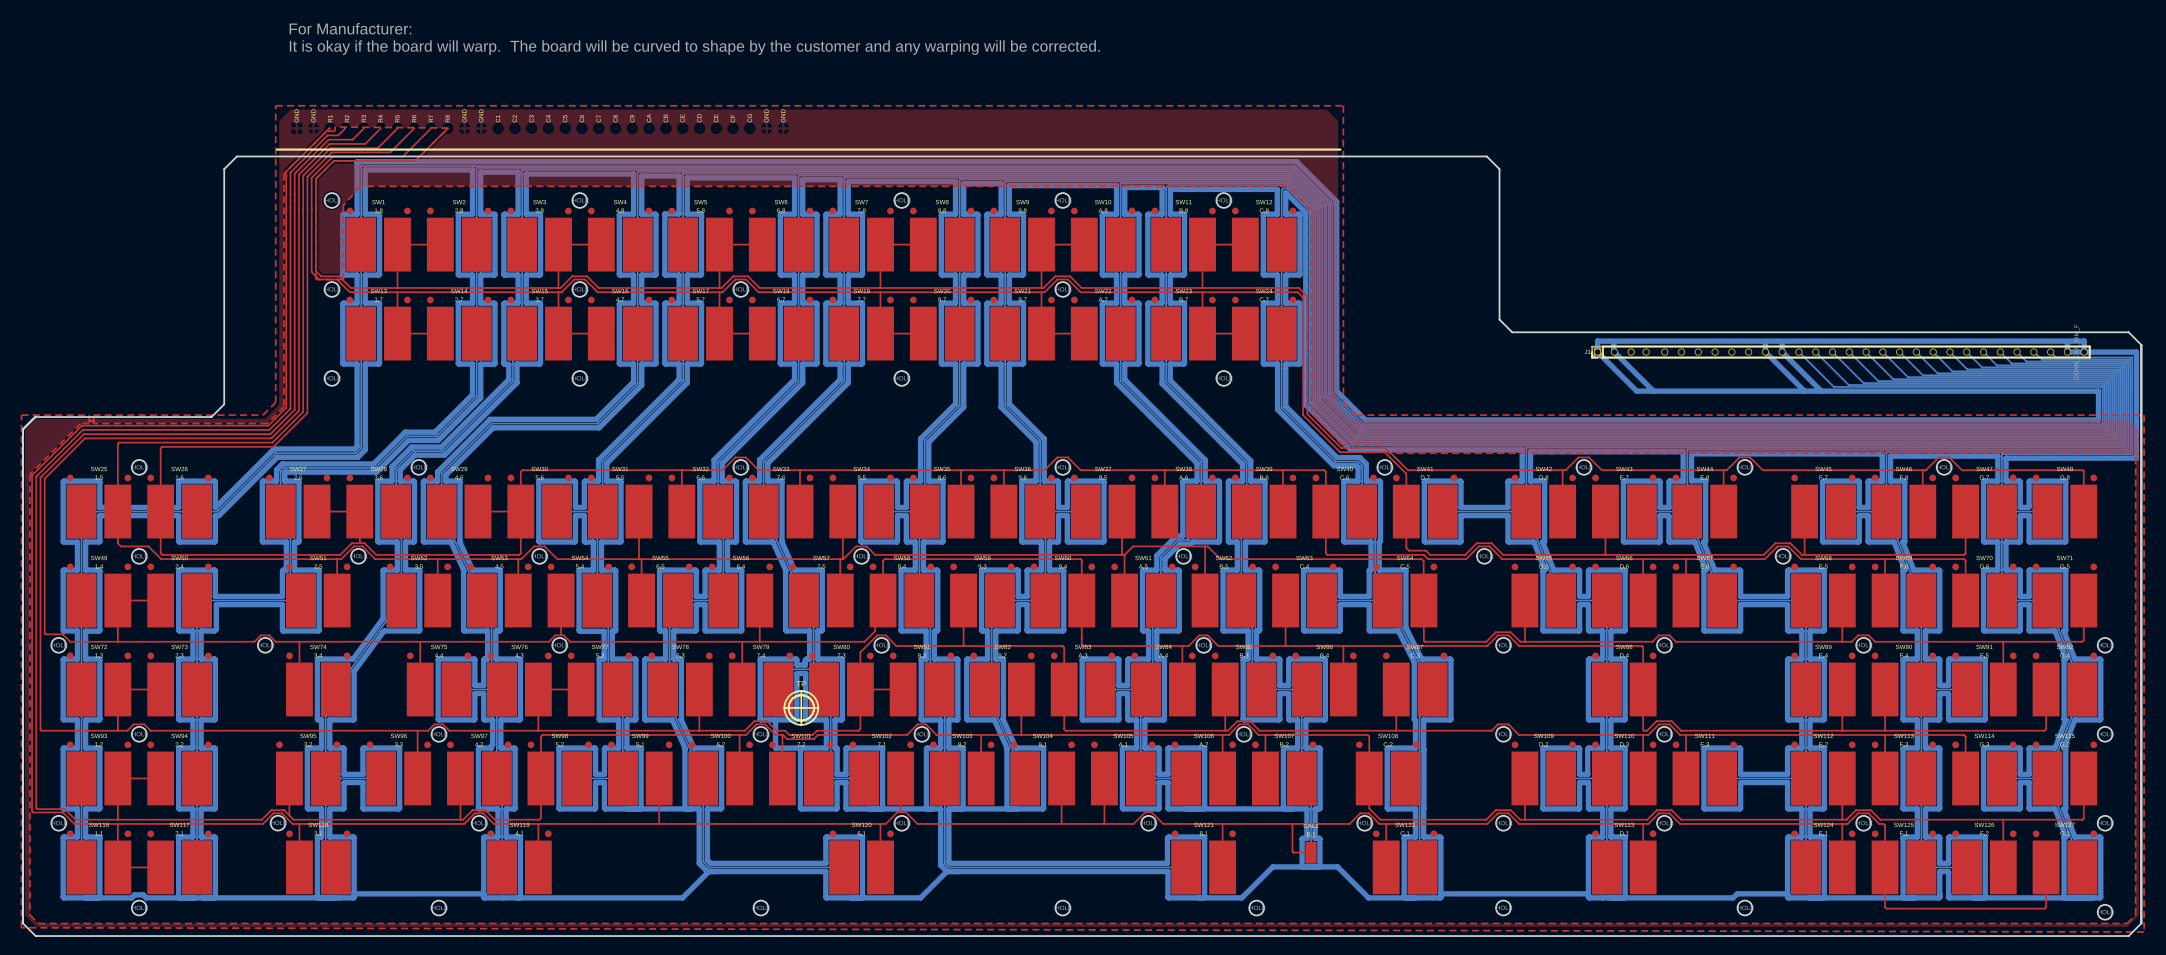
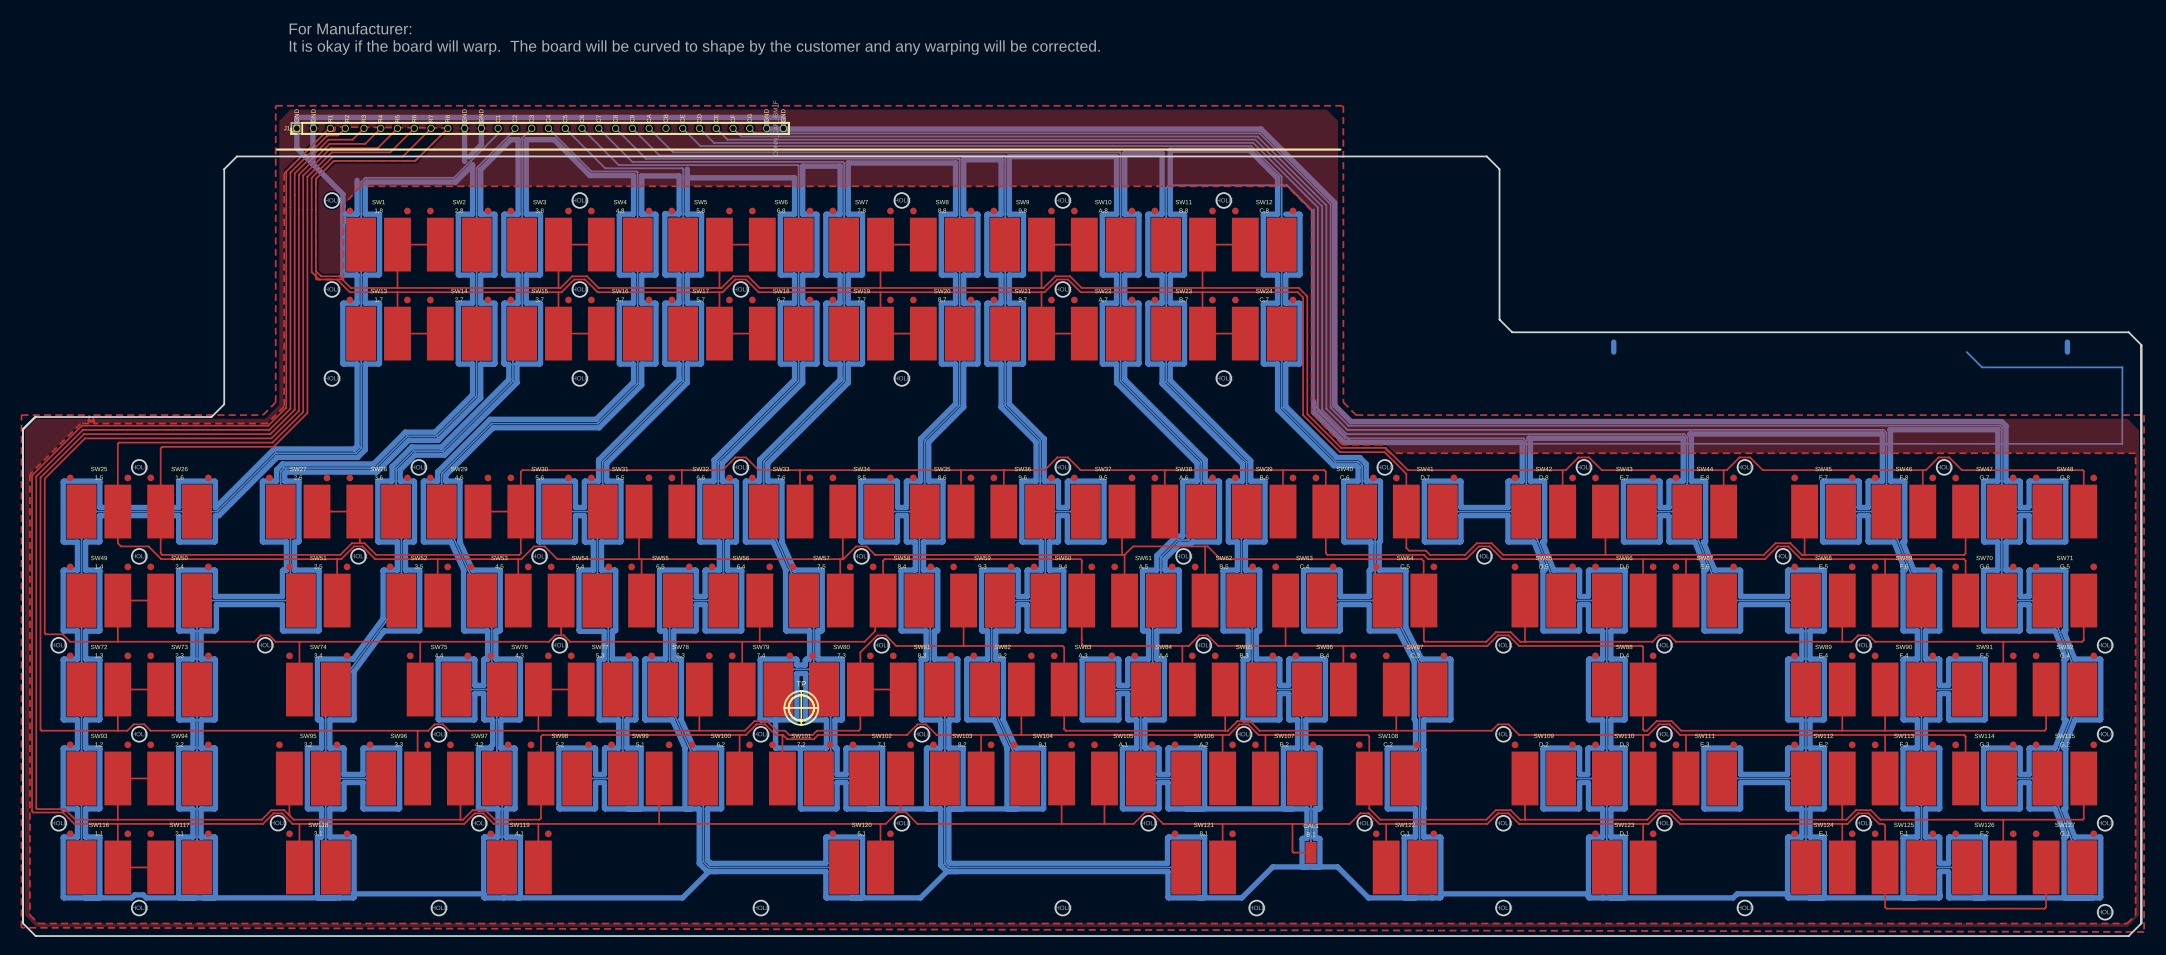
bottom track: none -> (312, 118) (312, 164)
bottom track: none -> (464, 118) (464, 161)
bottom track: none -> (481, 118) (481, 144) (469, 156)
bottom track: none -> (766, 118) (767, 129) (783, 128)
bottom track: none -> (498, 128) (498, 133) (470, 160)
bottom track: none -> (615, 128) (645, 158) (958, 158) (959, 179)
bottom track: none -> (783, 128) (783, 117) (296, 117) (296, 148) (342, 194) (342, 214)
bottom track: (476, 168) (1294, 167) (1330, 204) (1330, 394) (1362, 426) (2104, 426) (2104, 385) (1848, 385) (1815, 352) -> (476, 168) (514, 128)
bottom track: (472, 169) (365, 169) (365, 183) -> (472, 169) (472, 164) (455, 182) (366, 182) (365, 183)
bottom track: (522, 169) (1293, 169) (1328, 204) (1328, 395) (1361, 428) (2106, 428) (2106, 383) (1863, 383) (1832, 352) -> (522, 169) (522, 137) (531, 128)
bottom track: (480, 172) (518, 172) -> (480, 172) (480, 169) (510, 139) (518, 139) (518, 172)
bottom track: (637, 172) (1292, 171) (1326, 205) (1326, 395) (1360, 429) (2108, 429) (2108, 381) (1878, 381) (1849, 352) -> (637, 172) (591, 171) (548, 128)
bottom track: (683, 173) (1291, 173) (1324, 206) (1324, 396) (1359, 431) (2110, 431) (2110, 379) (1893, 379) (1866, 352) -> (683, 173) (682, 168) (605, 168) (565, 128)
bottom track: (526, 174) (633, 175) -> (526, 174) (526, 139) (554, 139) (589, 175) (633, 175)
bottom track: (798, 175) (1290, 175) (1322, 206) (1322, 397) (1358, 433) (2112, 433) (2112, 377) (1908, 377) (1882, 352) -> (798, 175) (797, 165) (618, 165) (582, 128)
bottom track: (844, 177) (1290, 177) (1319, 207) (1319, 398) (1357, 435) (2114, 435) (2114, 375) (1922, 375) (1899, 352) -> (844, 177) (842, 161) (632, 161) (598, 128)
bottom track: (802, 179) (840, 179) -> (802, 179) (802, 166) (840, 166) (840, 179)
bottom track: (959, 179) (1289, 179) (1317, 208) -> (699, 128) (713, 142) (1253, 142) (1317, 208)
bottom track: (357, 180) (357, 161) (1296, 161) (1336, 201) (1336, 391) (1365, 420) (2098, 420) (2098, 391) (1636, 391) (1597, 352) (1597, 341) (2084, 341) (2084, 352) (2136, 352) (2136, 458) (2006, 458) (2005, 481) -> (783, 128) (1261, 129) (1334, 202) (1334, 405) (1350, 421) (2001, 421) (2005, 425) (2005, 481)
bottom track: (848, 181) (955, 181) -> (848, 181) (848, 162) (955, 162) (955, 181)
bottom track: (1005, 181) (1288, 181) (1315, 208) (1315, 400) (1355, 439) (2118, 439) (2118, 371) (1952, 371) (1933, 352) -> (1005, 181) (1004, 155) (659, 155) (632, 128)
bottom track: (361, 182) (361, 165) (1295, 165) (1332, 203) (1332, 393) (1363, 424) (2102, 424) (2102, 386) (1833, 386) (1798, 352) -> (361, 182) (365, 177) (453, 177) (470, 160)
bottom track: (963, 183) (1001, 183) -> (963, 183) (963, 159) (1001, 159) (1001, 183)
bottom track: (1120, 183) (1287, 183) (1313, 209) -> (1120, 183) (1119, 152) (673, 152) (649, 128)
bottom track: (1009, 185) (1116, 185) -> (1009, 185) (1009, 156) (1116, 156) (1116, 185)
bottom track: (1124, 187) (1162, 187) -> (1124, 187) (1124, 153) (1162, 153) (1162, 187)
bottom track: (1281, 189) (1287, 188) (1309, 210) (1309, 403) (1352, 445) (2124, 445) (2124, 365) (1996, 365) (1983, 352) -> (1281, 189) (1281, 176) (1251, 146) (700, 146) (682, 128)
bottom track: (1183, 214) (1170, 214) (1170, 189) (1277, 189) (1277, 214) -> (1183, 214) (1170, 214) (1170, 150) (1249, 150) (1277, 178) (1277, 214)
bottom track: (1285, 214) (1285, 192) (1305, 212) (1305, 404) (1350, 449) (1522, 449) (1522, 481) -> (1313, 401) (1313, 412) (1343, 442) (1521, 442) (1522, 481)
bottom track: (1765, 342) (1765, 352) (1804, 391) -> none
bottom track: (1782, 342) (1782, 352) (1821, 391) -> none
bottom track: (1614, 352) (1653, 391) -> none
part position: (1840, 352) -> (540, 128)
bottom track: (1916, 352) (1937, 373) (2116, 373) (2116, 437) (1356, 437) (1317, 399) -> (1526, 511) (1526, 441) (1523, 438) (1345, 438) (1317, 410) (1317, 399)
bottom track: (1949, 352) (1967, 369) (2120, 369) (2120, 441) (1354, 441) (1313, 401) -> none
bottom track: (2000, 352) (2011, 363) (2126, 363) (2126, 447) (1526, 447) (1526, 511) -> none
bottom track: (2017, 352) (2026, 361) (2128, 361) (2128, 449) (1687, 449) (1687, 511) -> (716, 128) (727, 139) (1255, 139) (1322, 206) (1322, 409) (1346, 434) (1684, 434) (1687, 437) (1687, 511)
bottom track: (2033, 352) (2042, 359) (2130, 359) (2130, 452) (1886, 452) -> (733, 128) (741, 136) (1257, 136) (1326, 205) (1326, 408) (1347, 429) (1883, 429) (1886, 432) (1886, 452)
bottom track: (2050, 352) (2056, 357) (2132, 357) (2132, 454) (2001, 454) -> (749, 128) (754, 133) (1259, 133) (1330, 204) (1330, 407) (1348, 425) (2000, 425) (2001, 427) (2001, 454)
bottom track: (2068, 352) (2083, 352) -> none
bottom track: (1890, 456) (1997, 456) (1997, 481) -> (1890, 456) (1890, 429) (1997, 429) (1997, 481)
bottom track: (1543, 481) (1530, 480) (1530, 451) (1683, 451) (1683, 481) -> (1543, 481) (1530, 481) (1528, 438) (1682, 438) (1683, 481)
bottom track: (1704, 481) (1691, 480) (1691, 453) (1882, 454) (1882, 481) -> (1704, 481) (1691, 481) (1689, 433) (1881, 433) (1882, 481)

